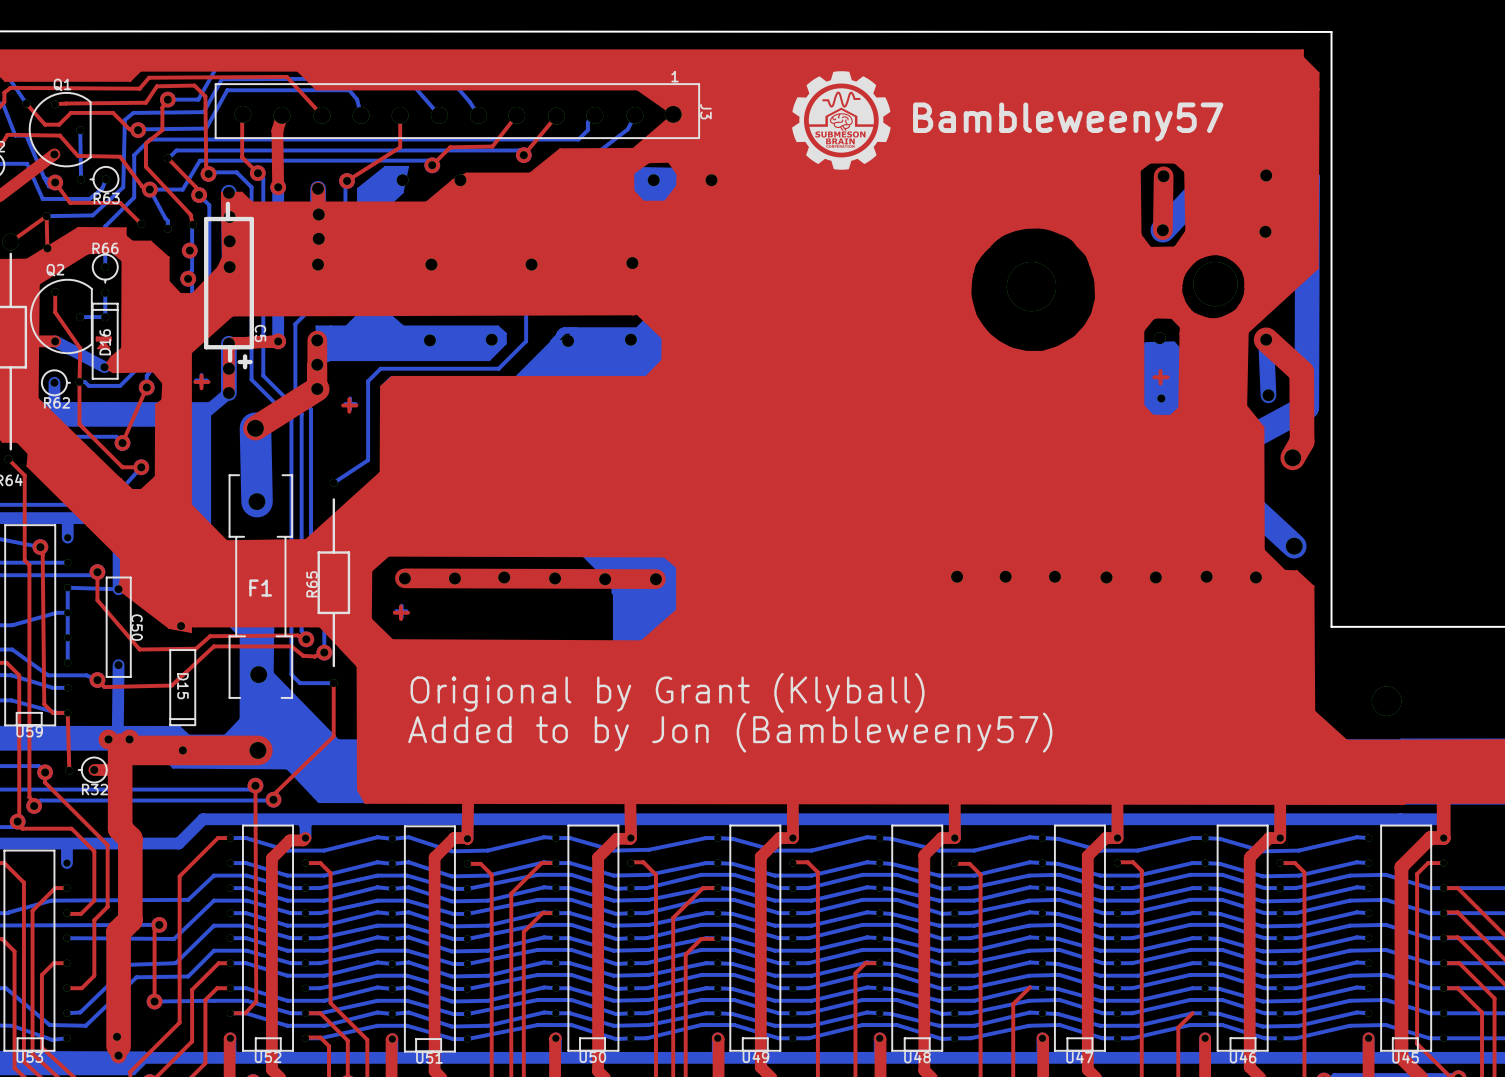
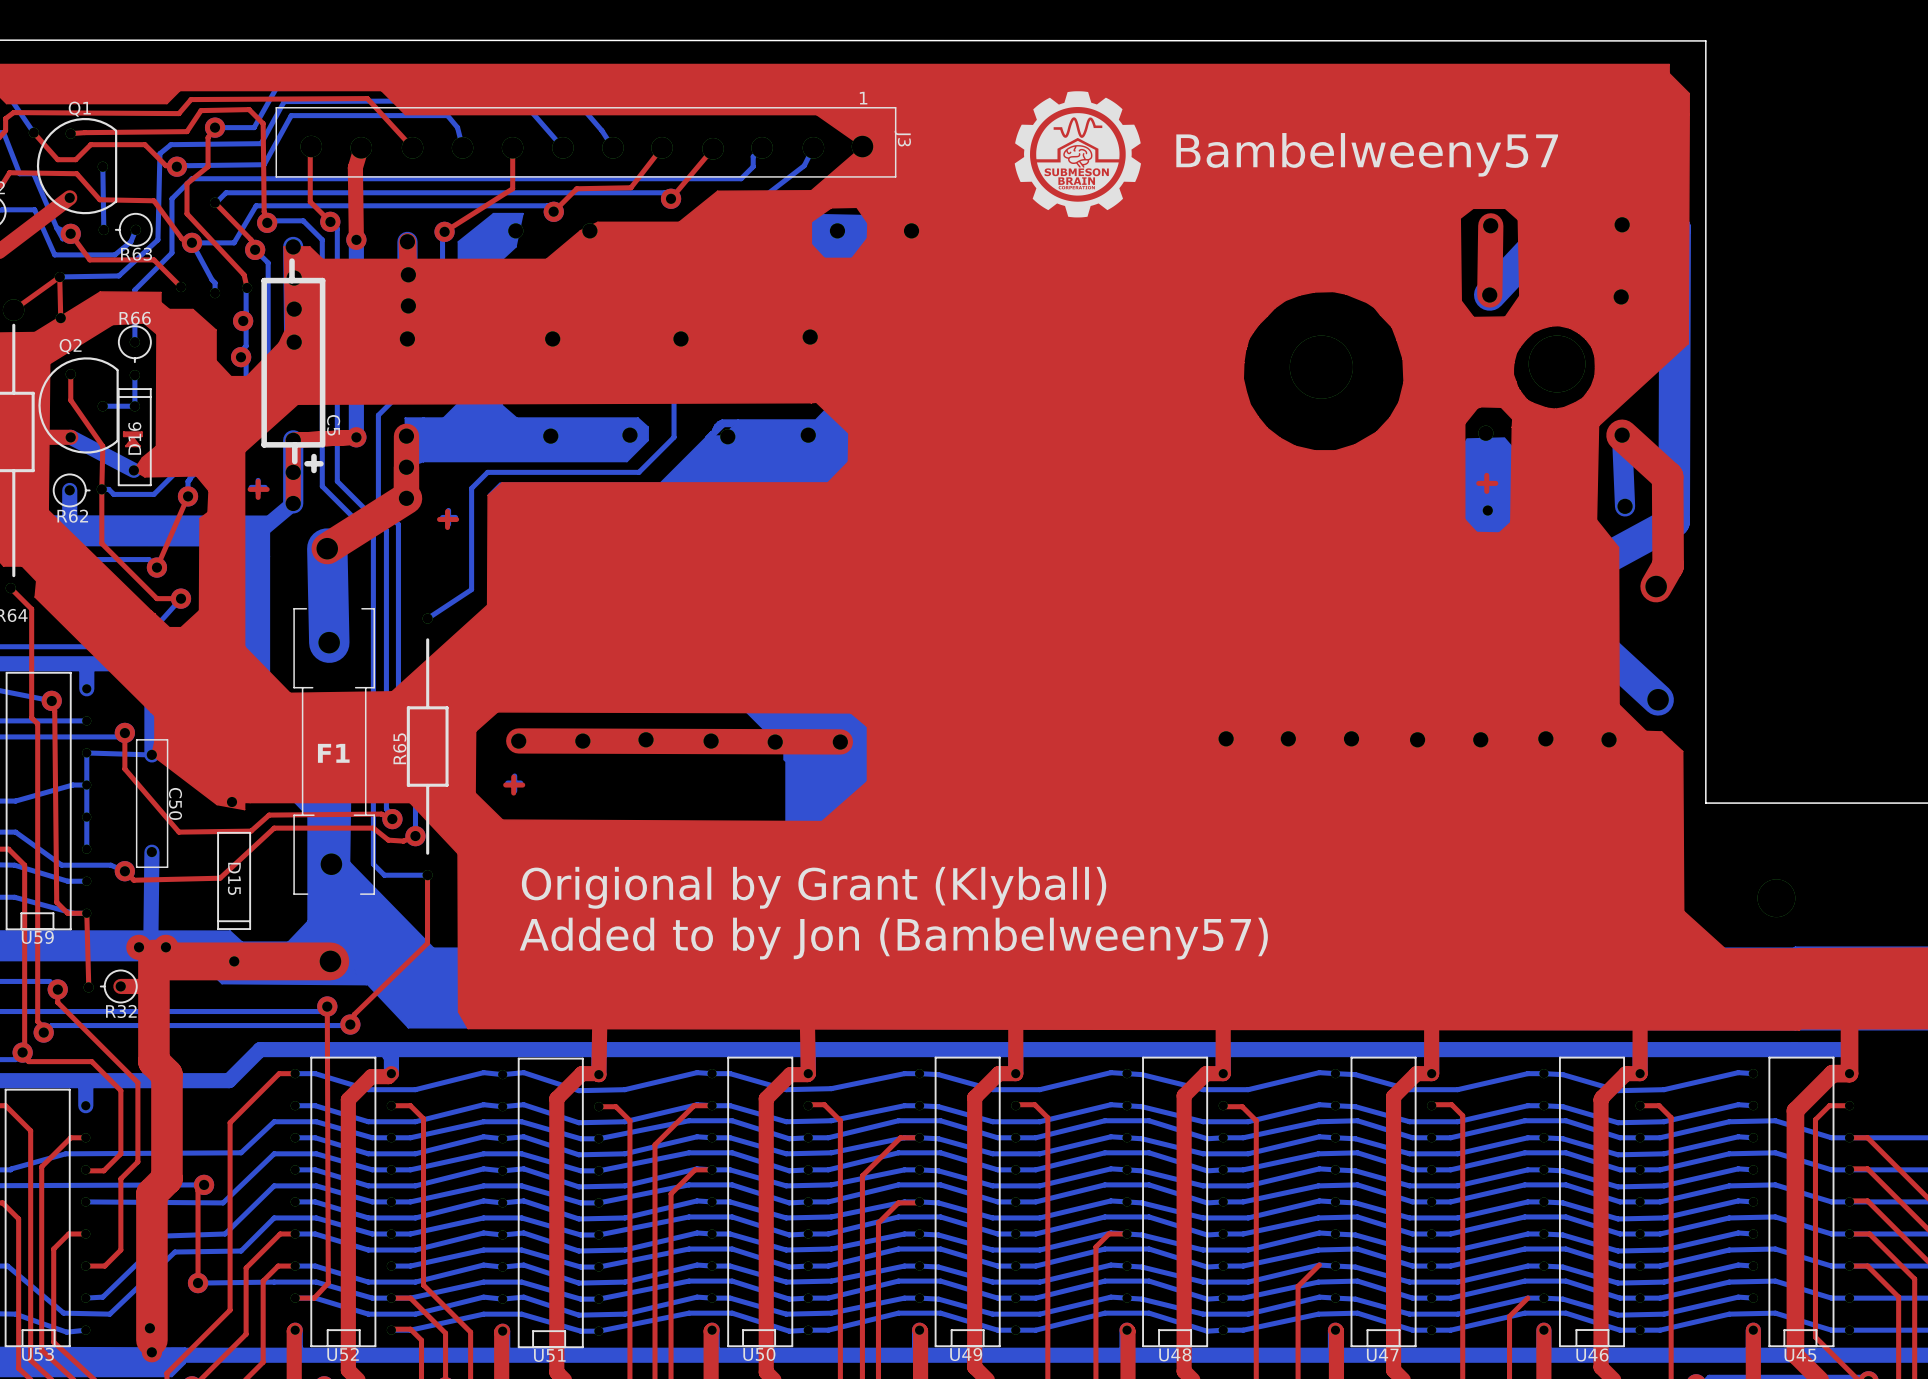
text: Bambleweeny57 (1068, 122) -> Bambelweeny57 (1367, 154)
text: Added to by Jon (Bambleweeny57) (730, 732) -> Added to by Jon (Bambelweeny57) (893, 938)

